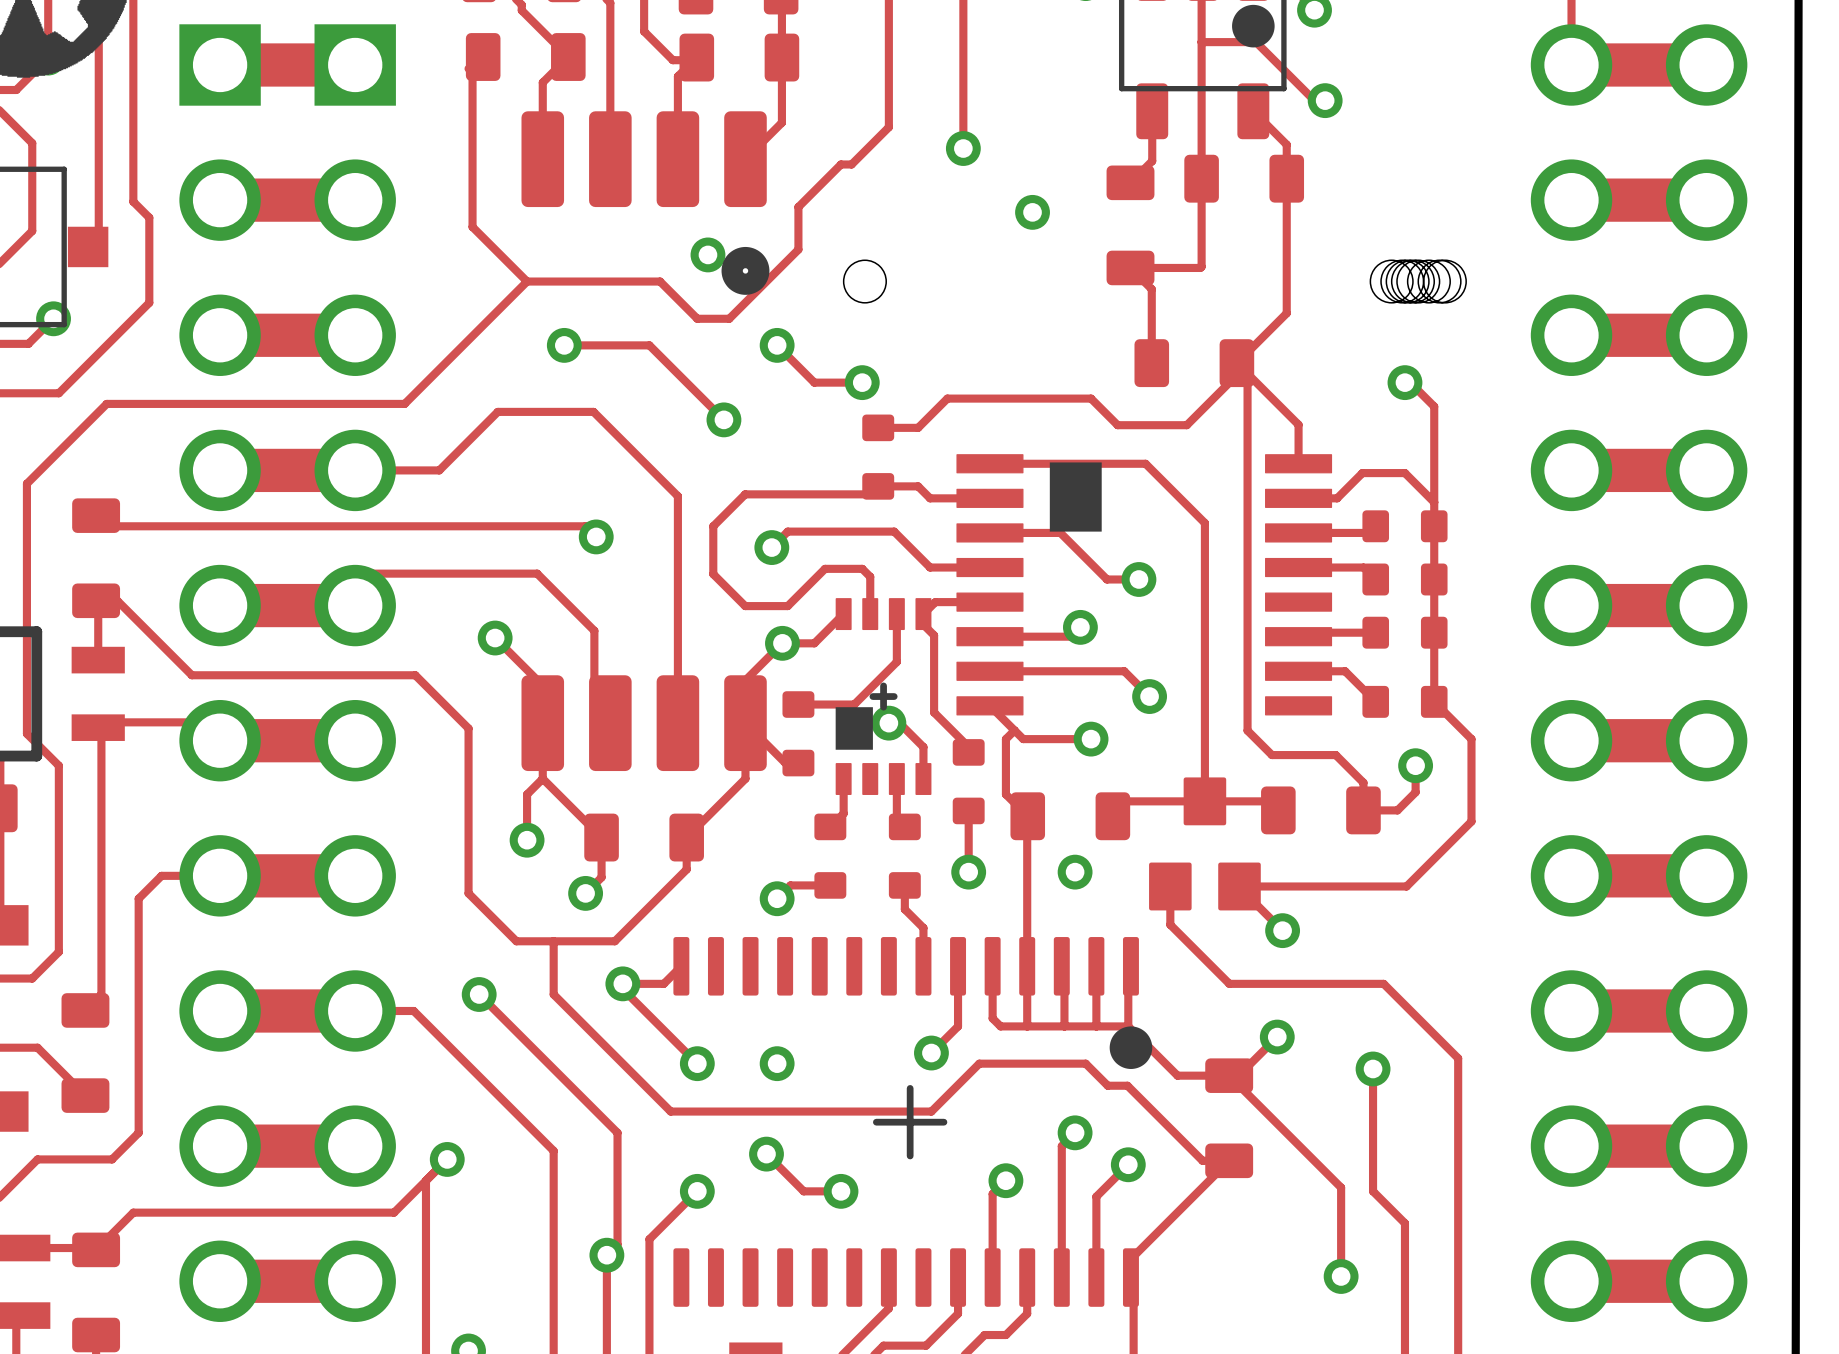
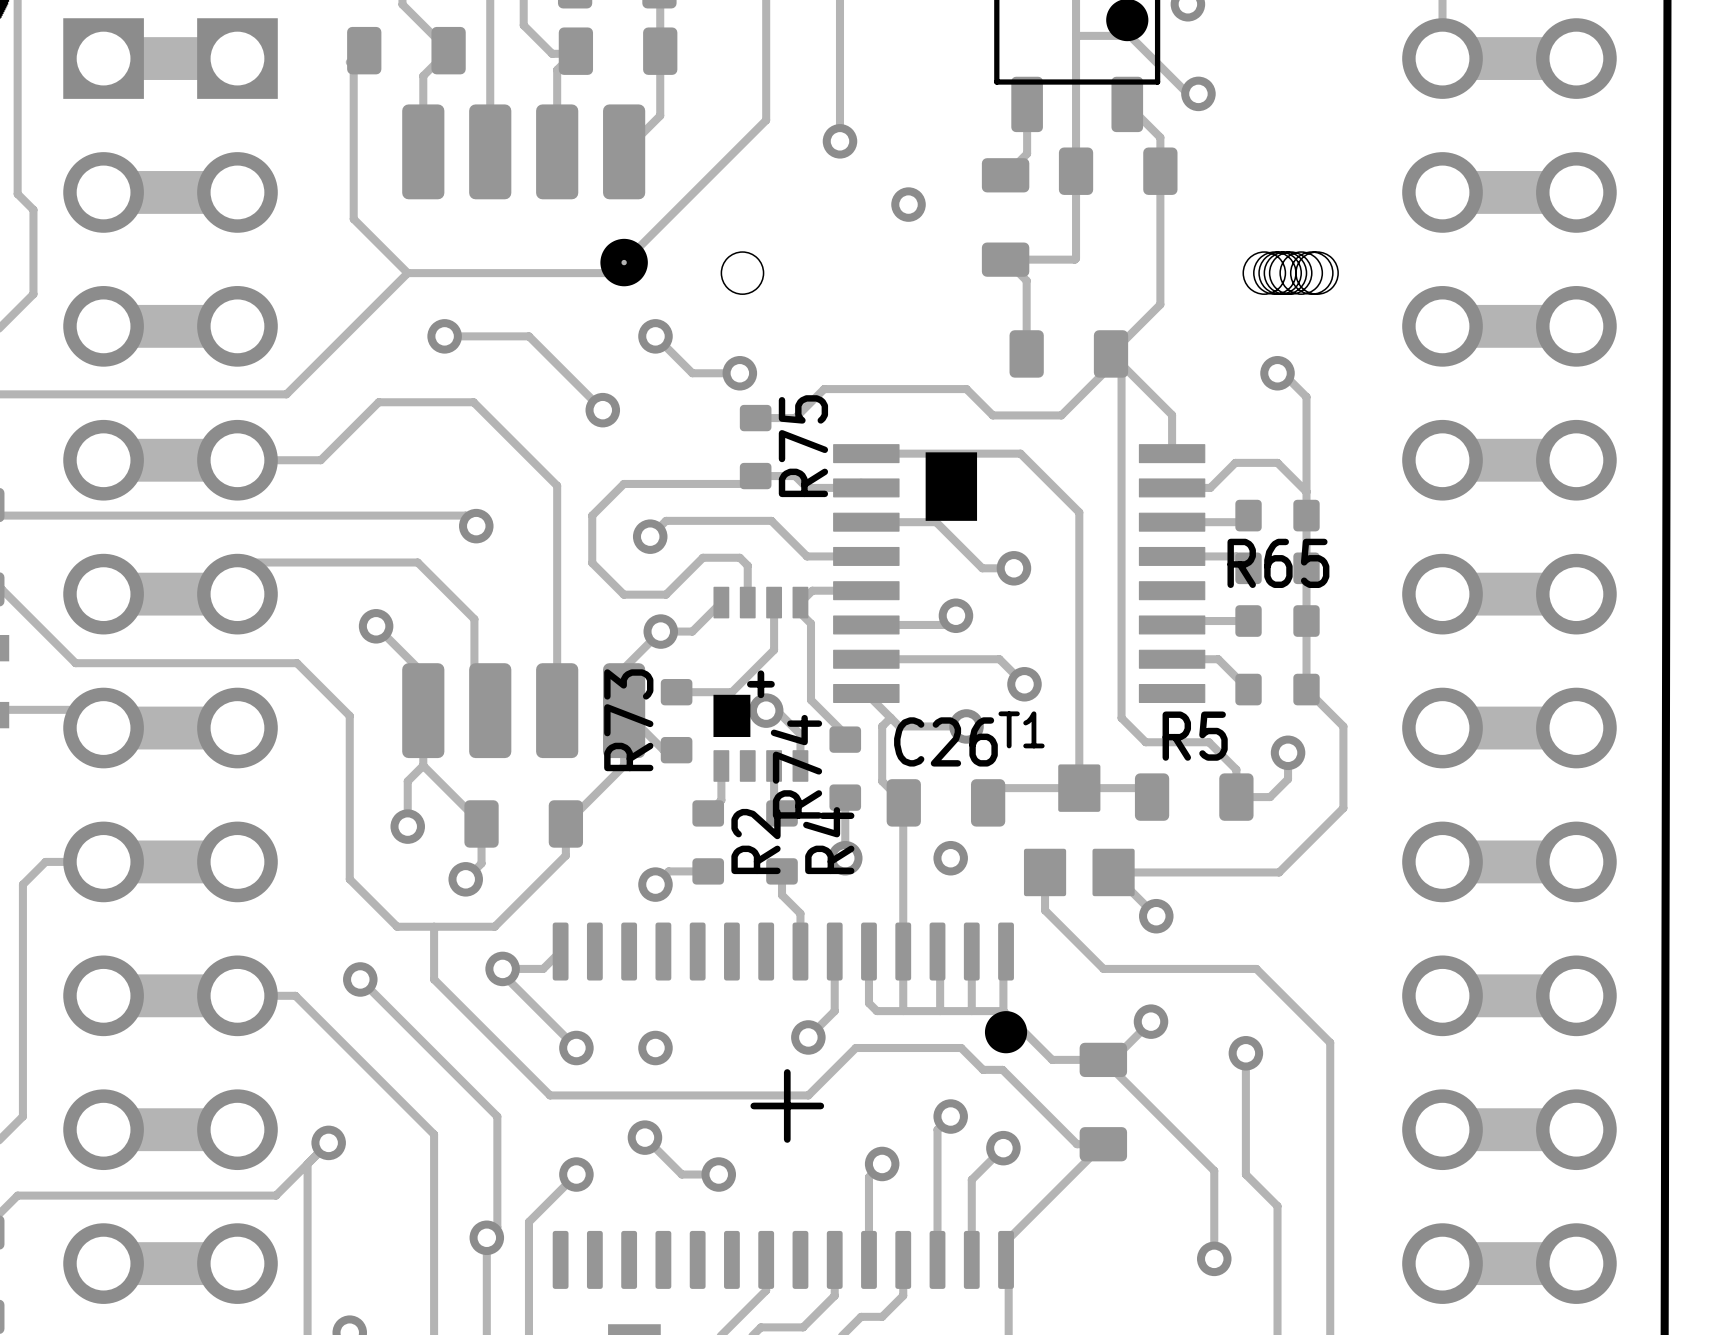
track: (851, 164) (840, 164) (798, 207) (798, 249) (729, 318) (697, 318) (660, 281) -> (729, 157) (613, 273) (539, 273)
via: (707, 254) -> none
R75 name: none -> R75 (803, 446)
R65 name: none -> R65 (1278, 563)
R73 name: none -> R73 (628, 720)
T1 name: none -> T1 (1021, 729)
R5 name: none -> R5 (1195, 736)
C26 name: none -> C26 (945, 741)
R74 name: none -> R74 (796, 766)
R4 name: none -> R4 (828, 840)
R2 name: none -> R2 (755, 841)

